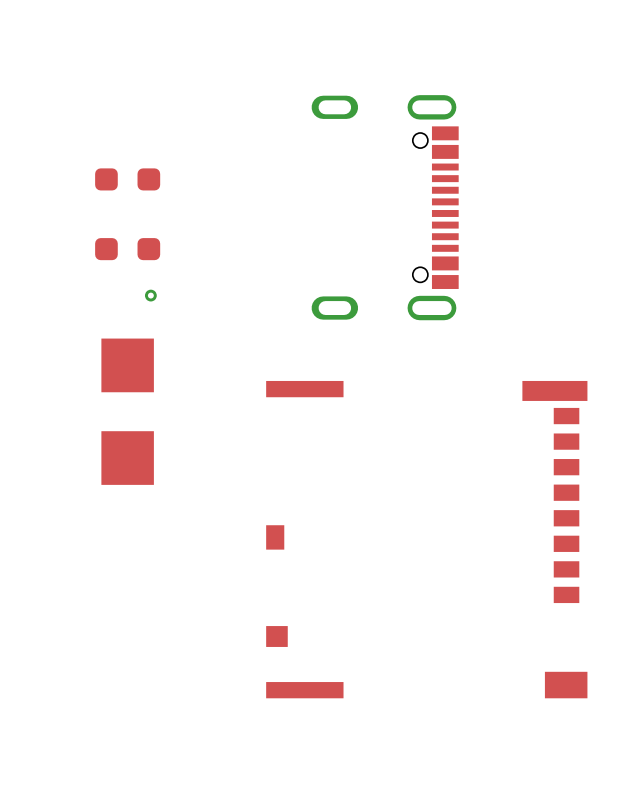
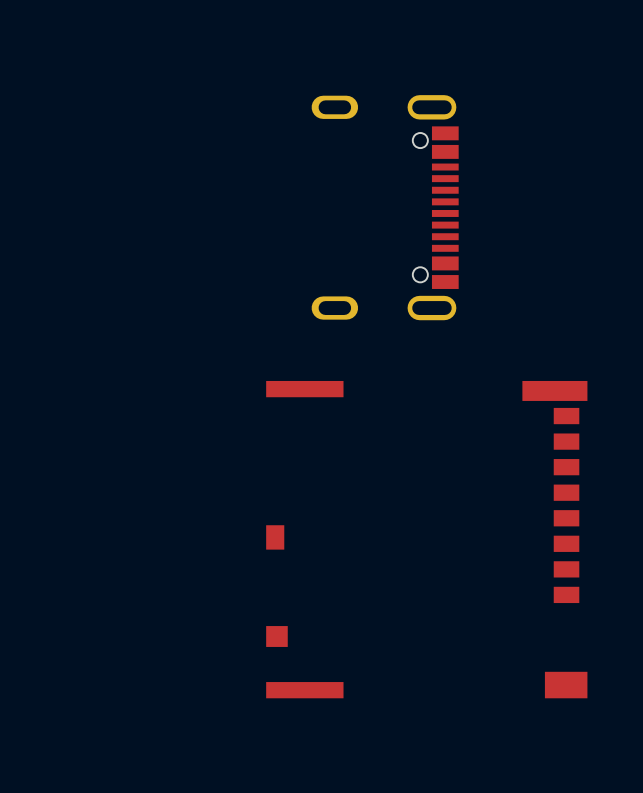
part: (127, 179) -> none
part: (127, 249) -> none
via: (150, 295) -> none
part: (127, 411) -> none

